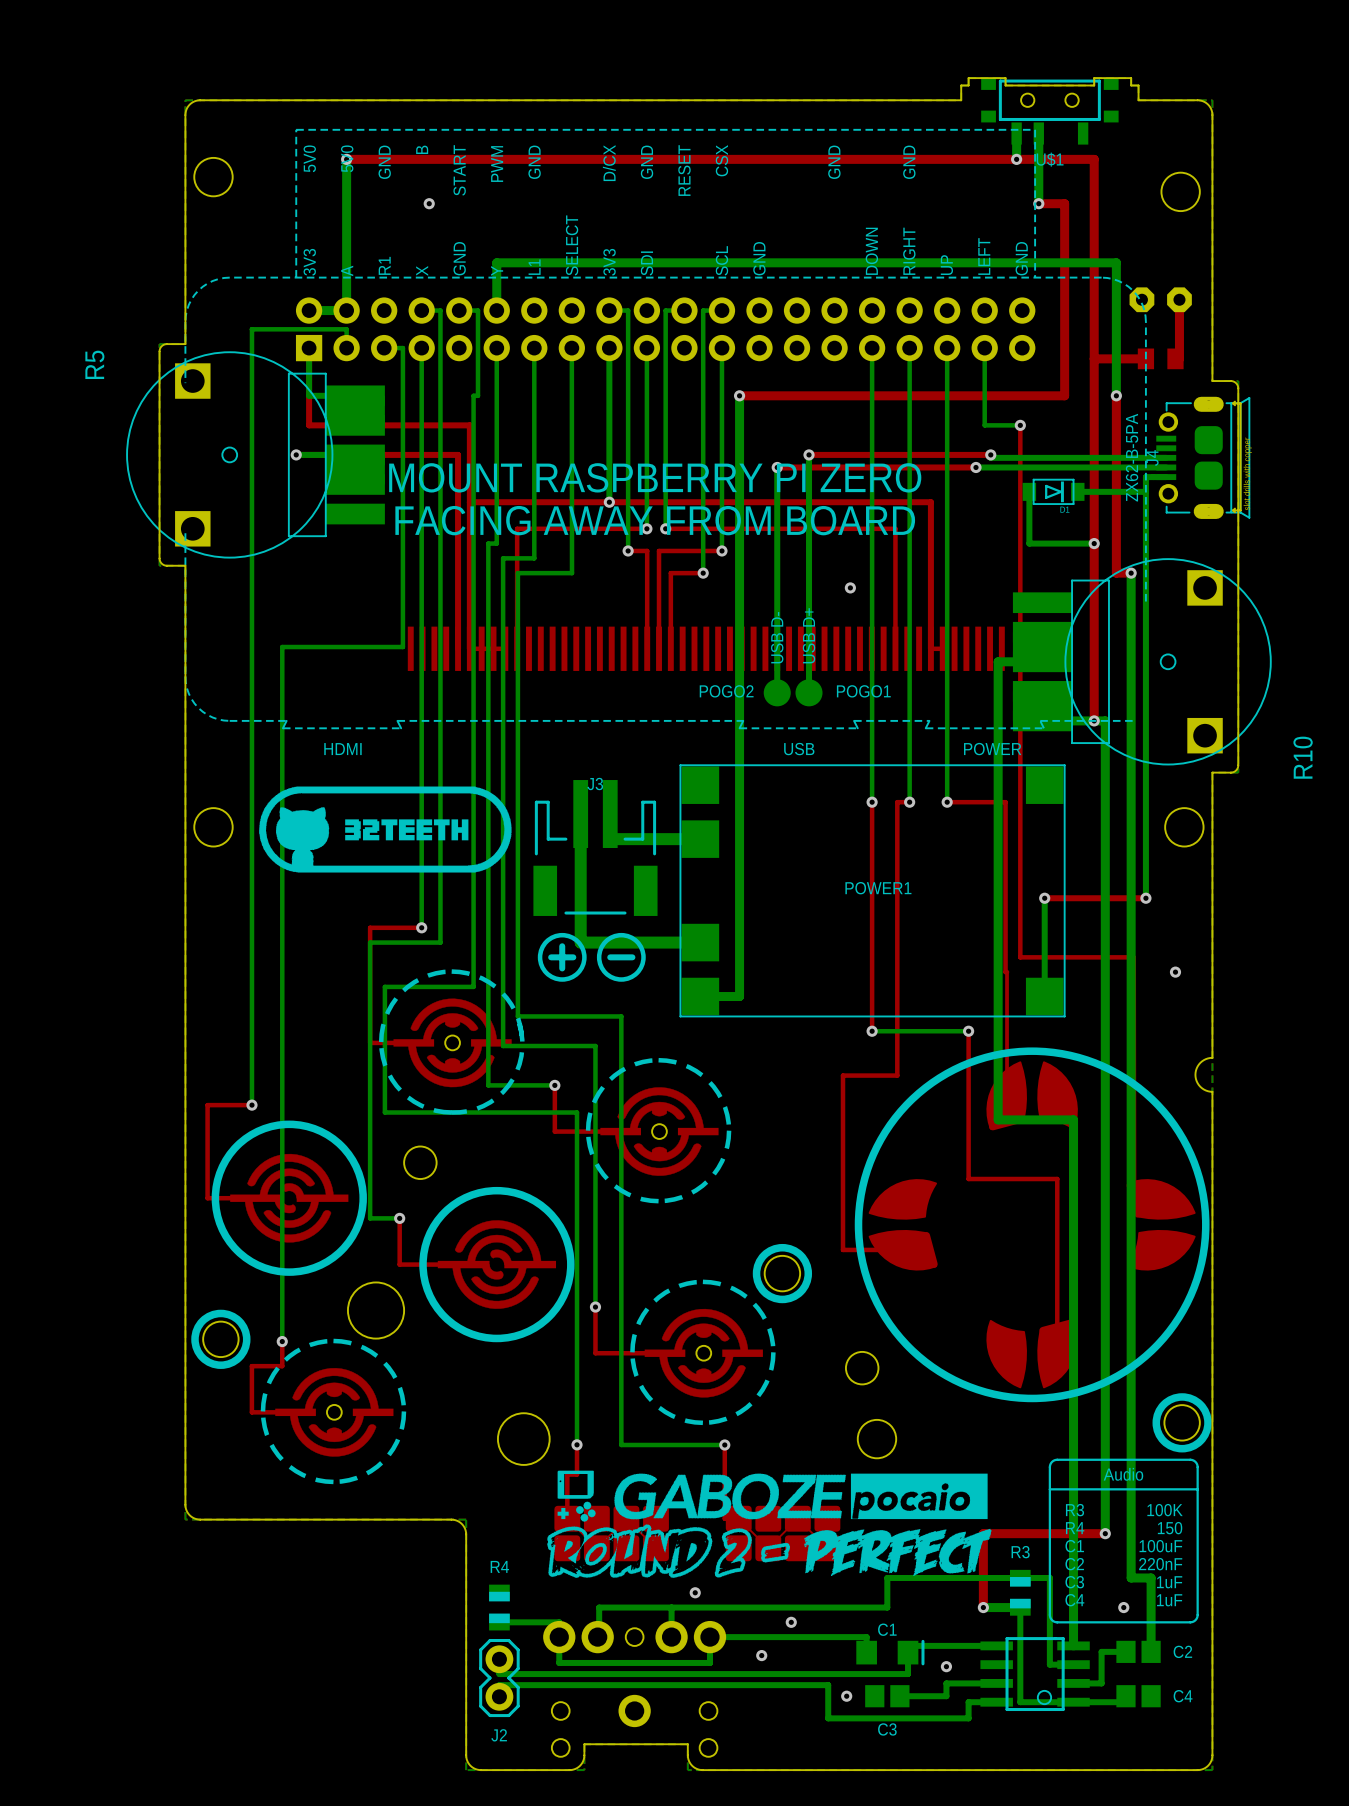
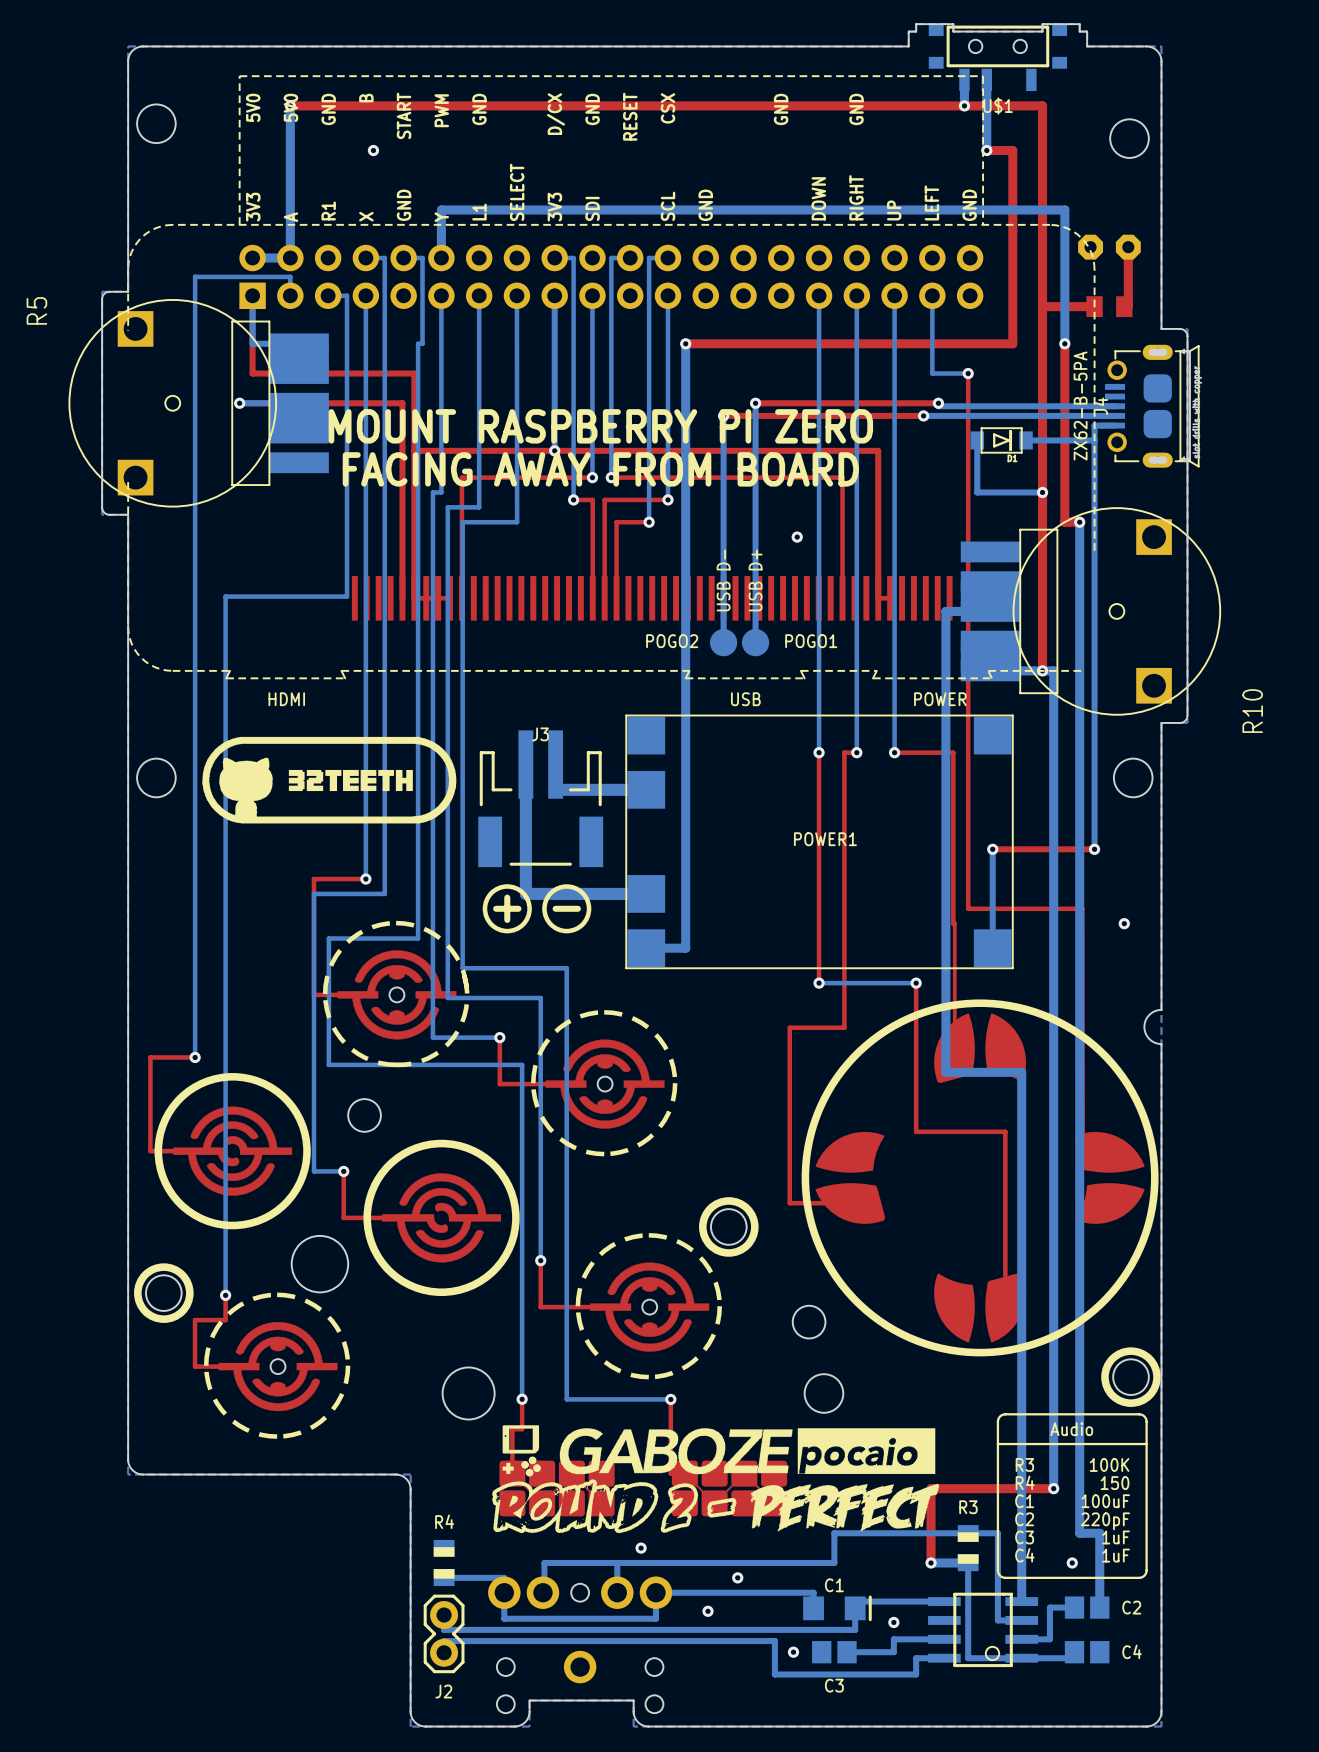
text: 220nF (1160, 1564) -> 220pF (1105, 1521)

